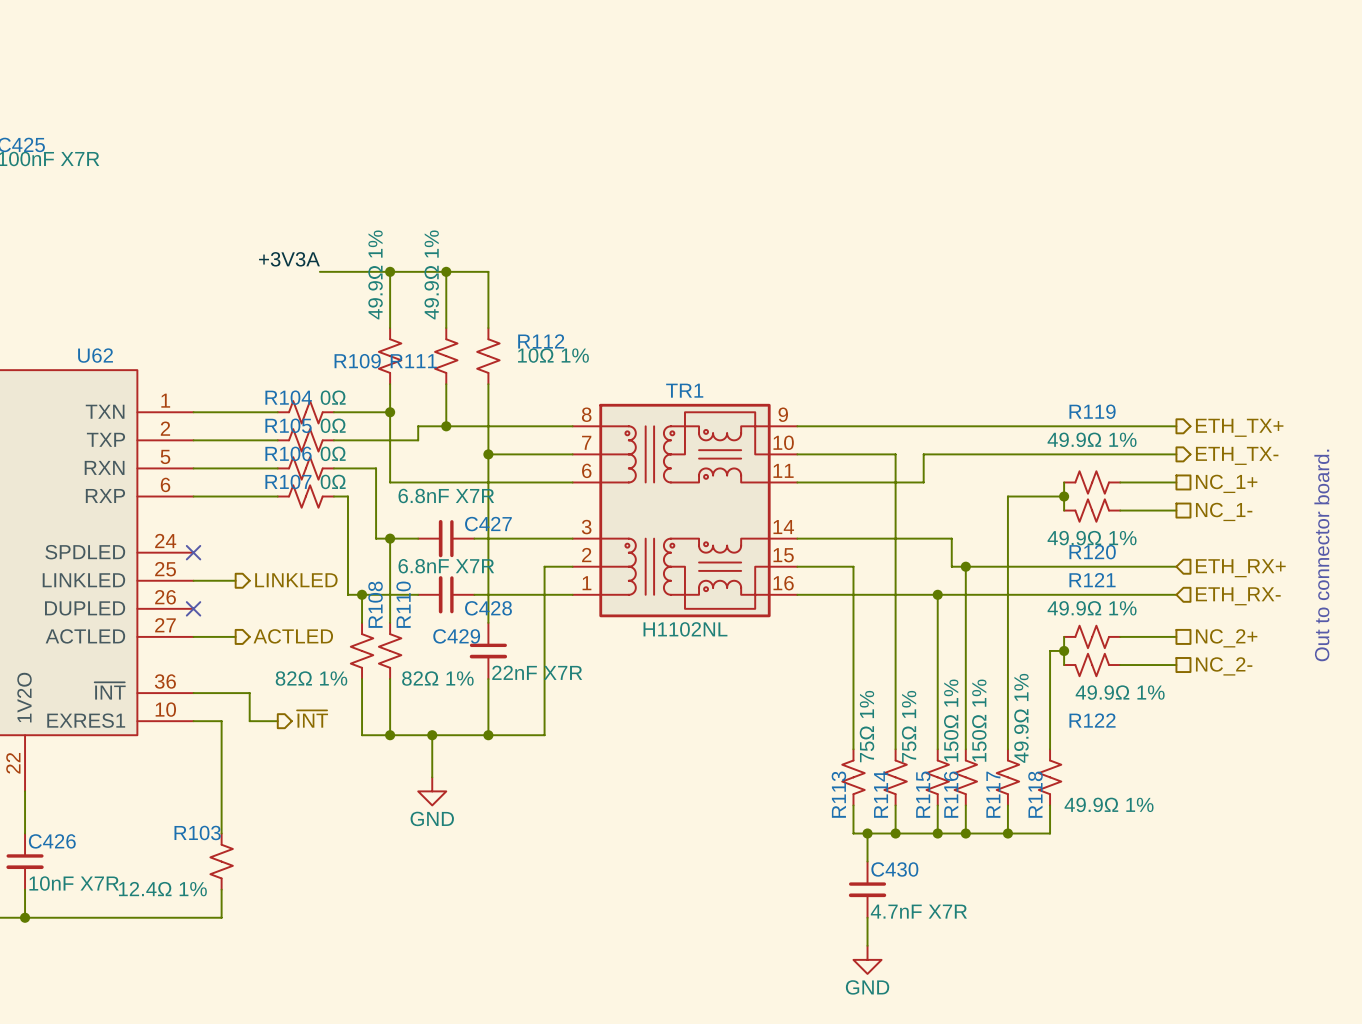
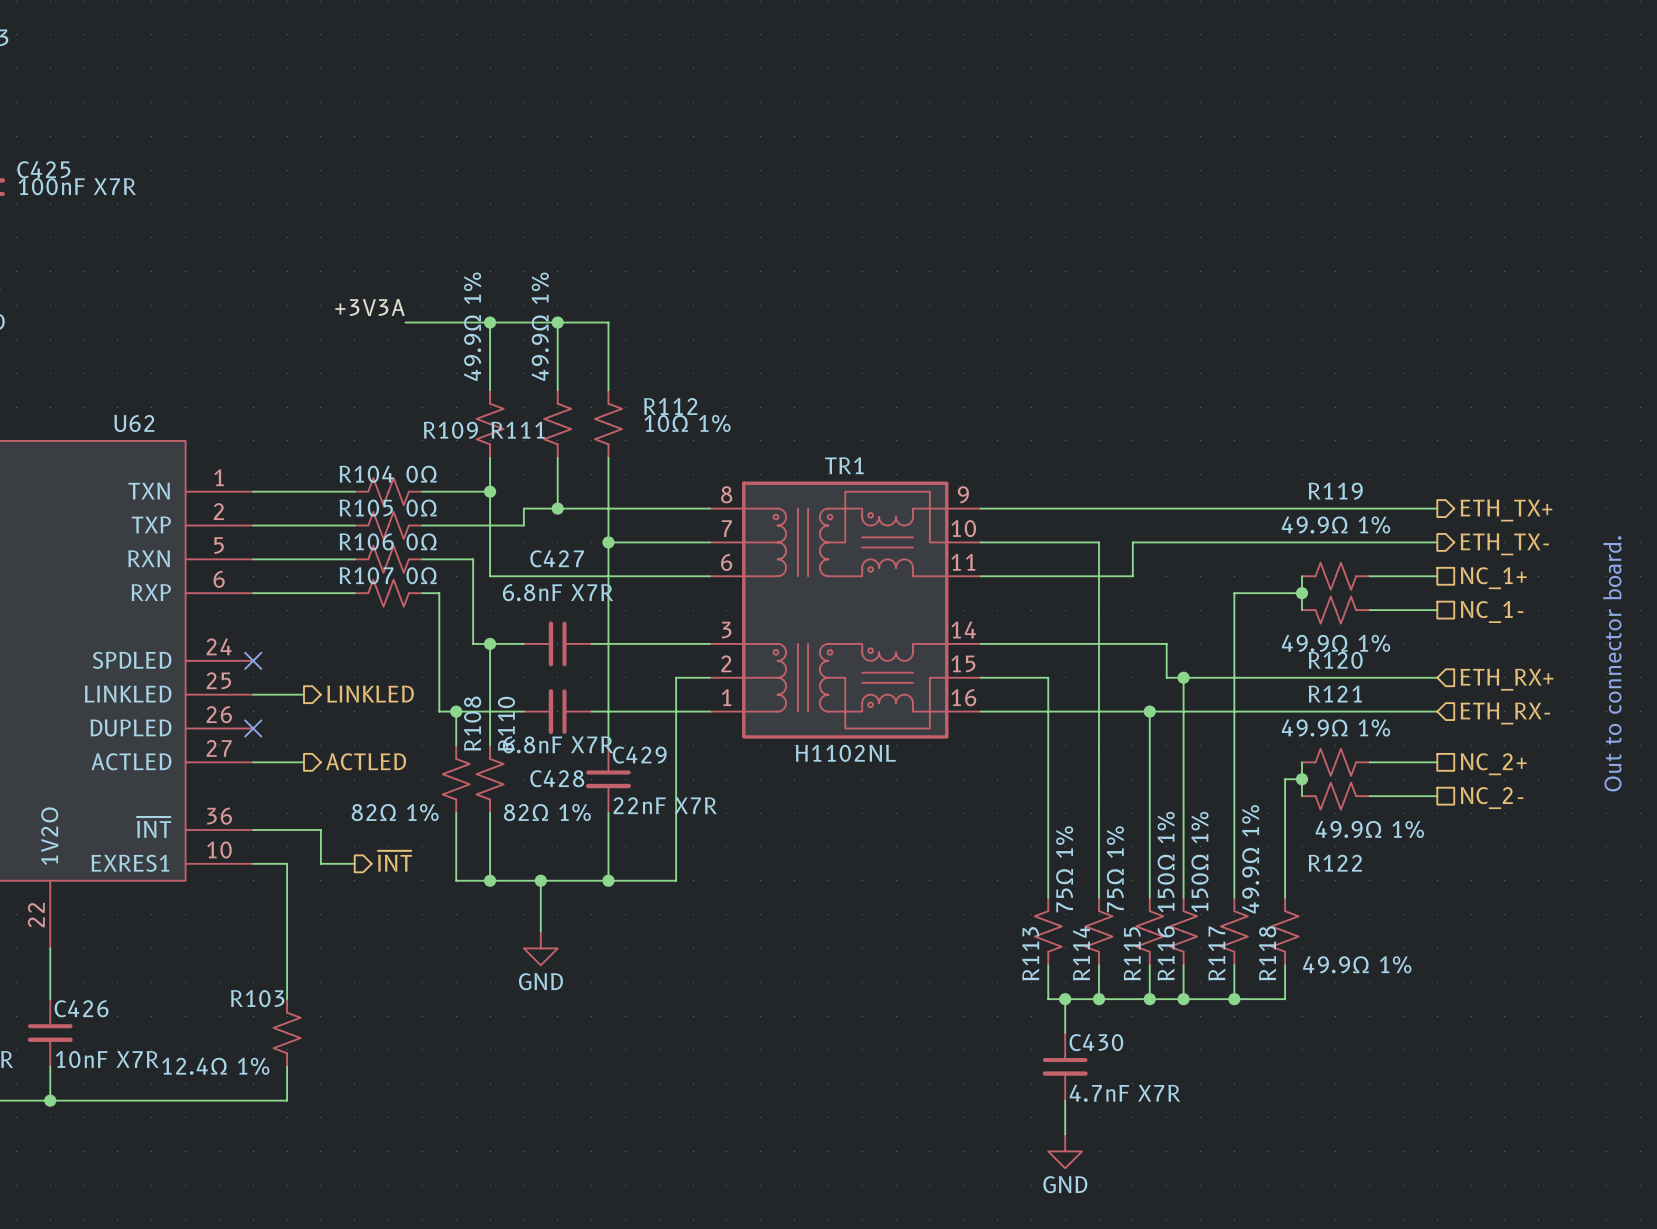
C427 name position: C427 (488, 524) -> C427 (557, 558)
C428 value position: 6.8nF X7R (446, 566) -> 6.8nF X7R (558, 744)
C428 name position: C428 (488, 608) -> C428 (557, 778)
C429 name position: C429 (456, 636) -> C429 (639, 755)

